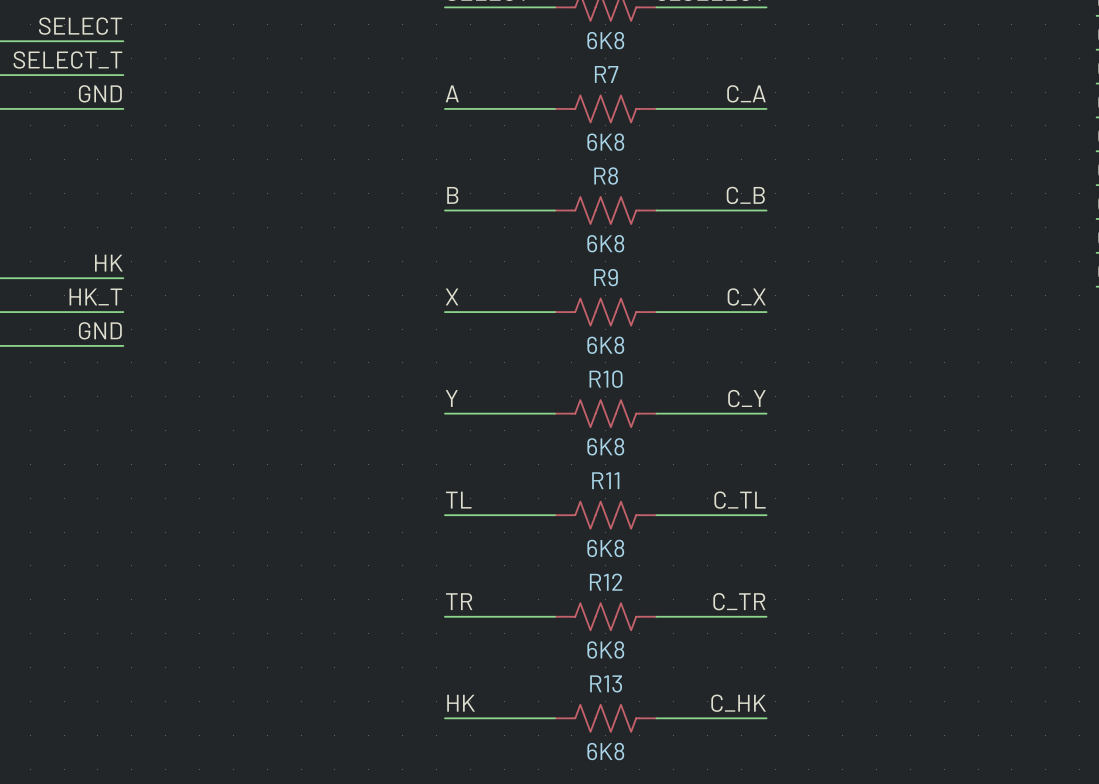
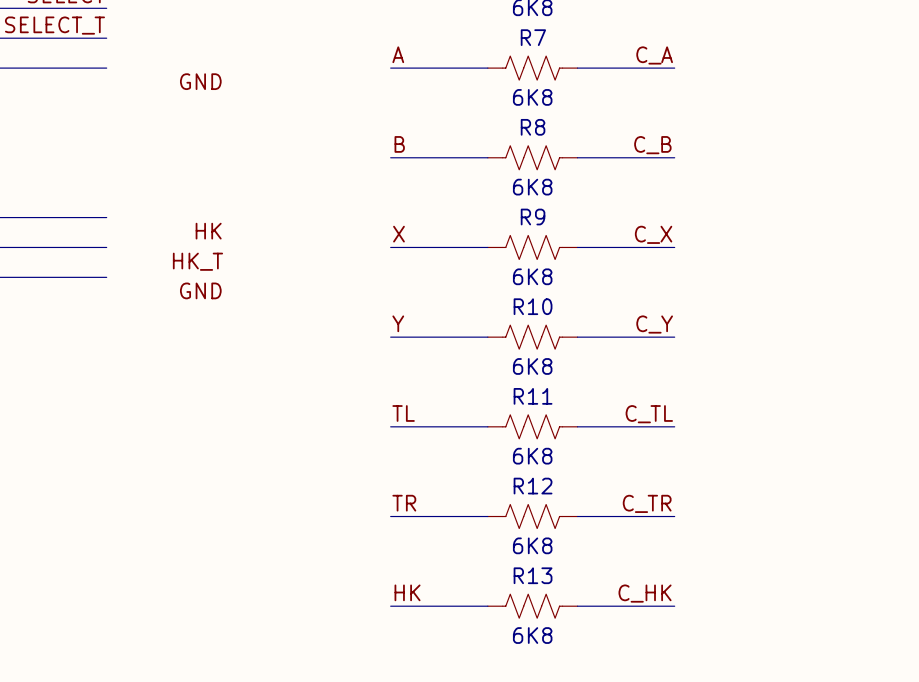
label: GND (100, 93) -> none
label: none -> GND (200, 81)
label position: HK (108, 263) -> HK (208, 231)
label position: HK_T (95, 296) -> HK_T (197, 261)
label: GND (100, 330) -> none
label: none -> GND (200, 290)

